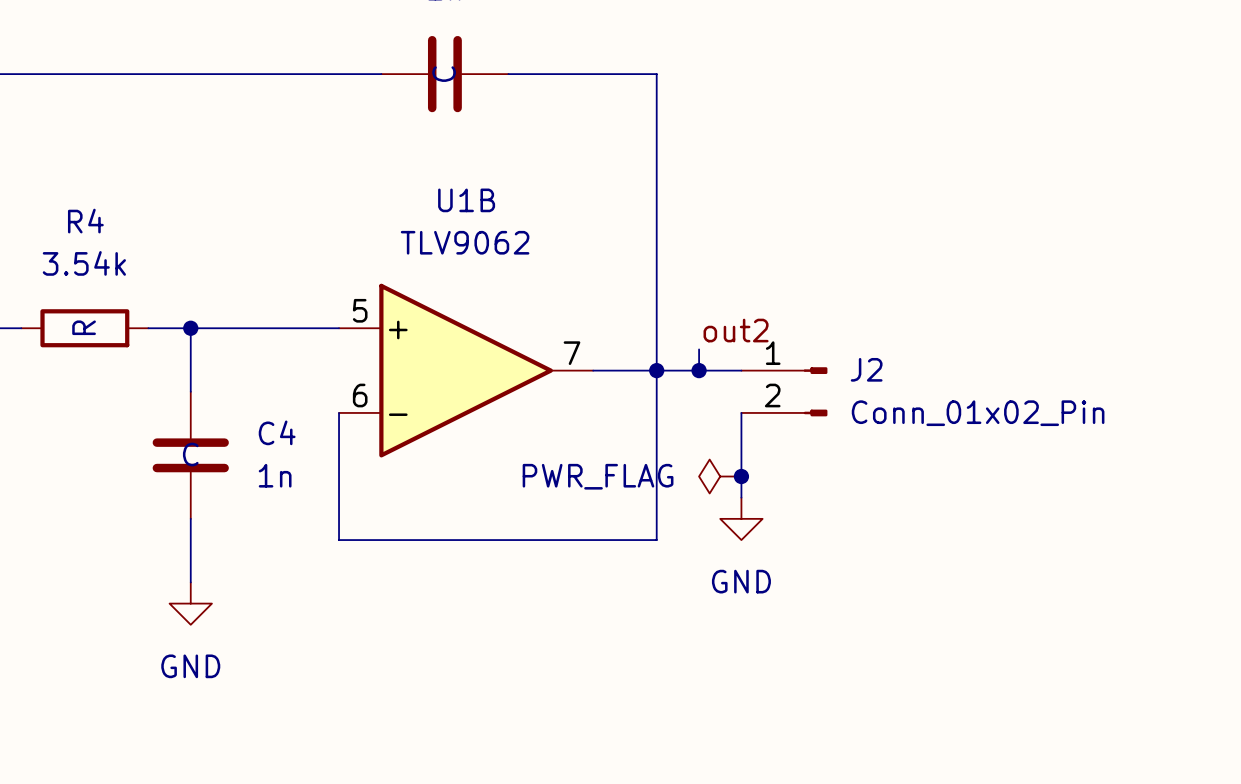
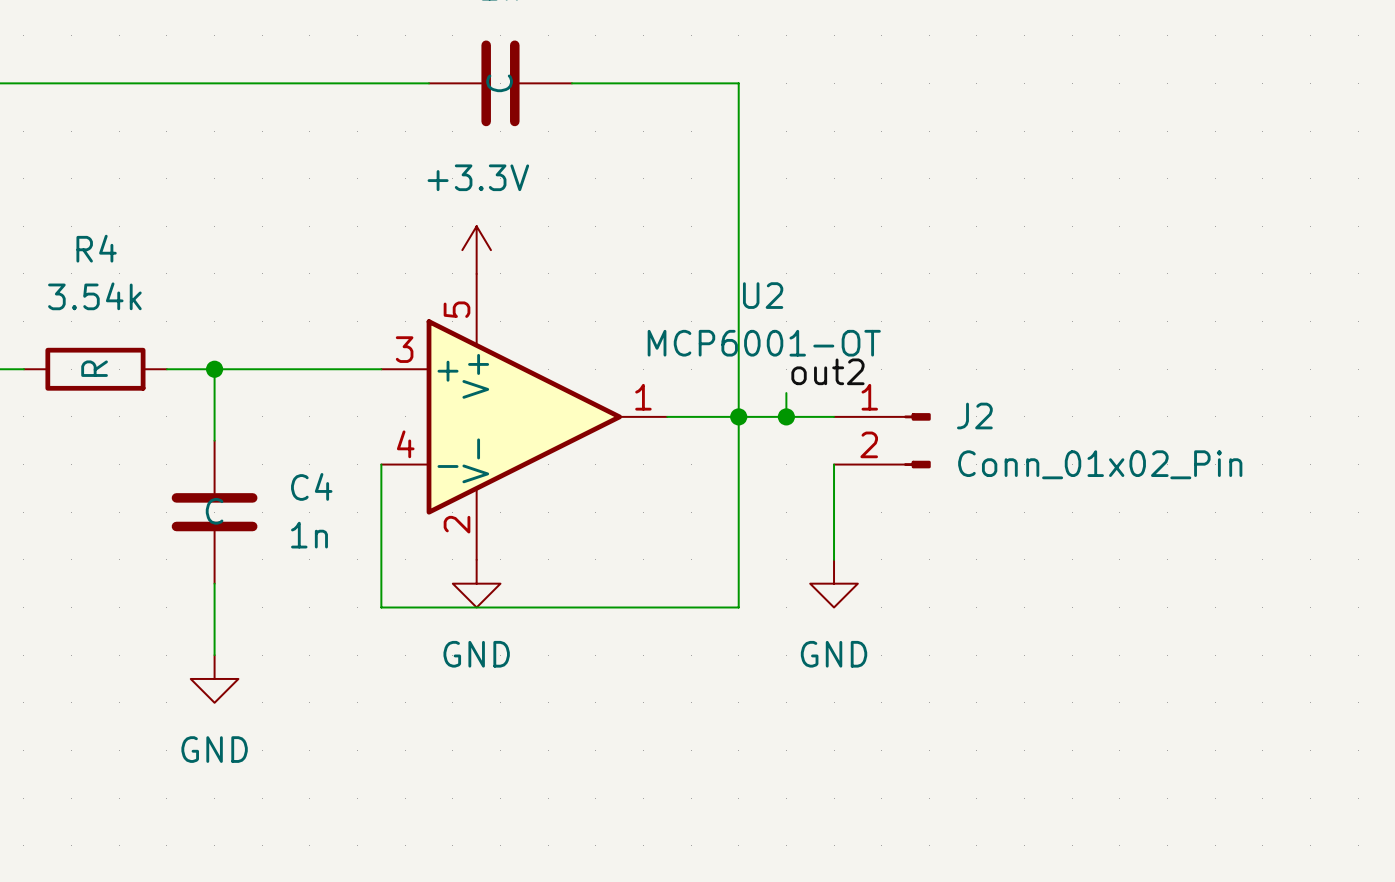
power symbol: none -> +3.3V (476, 250)
U1B: TLV9062 (466, 370) -> none
U2: none -> MCP6001-OT (524, 416)
power symbol: PWR_FLAG (720, 476) -> none
junction: (741, 476) -> none
power symbol: none -> GND (476, 583)

